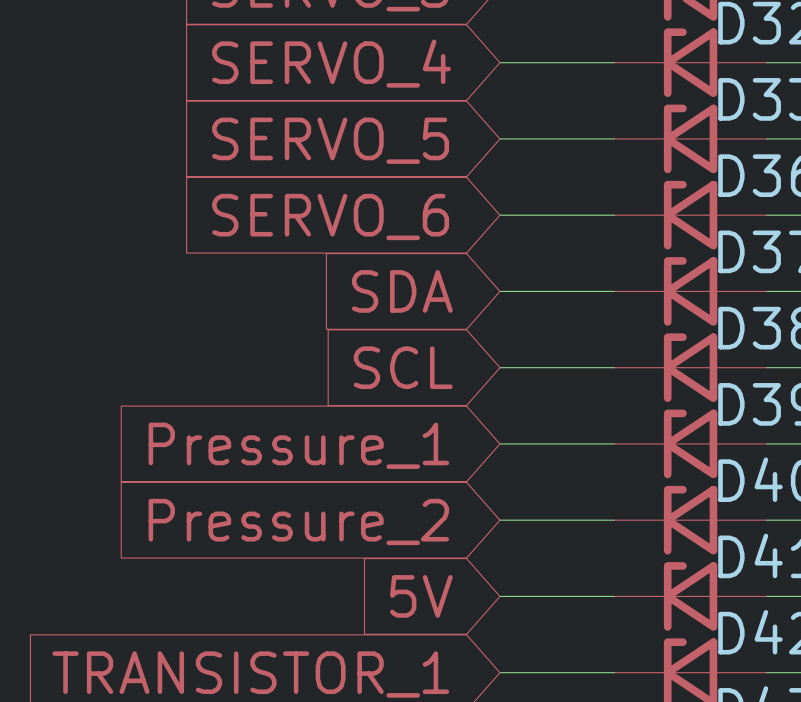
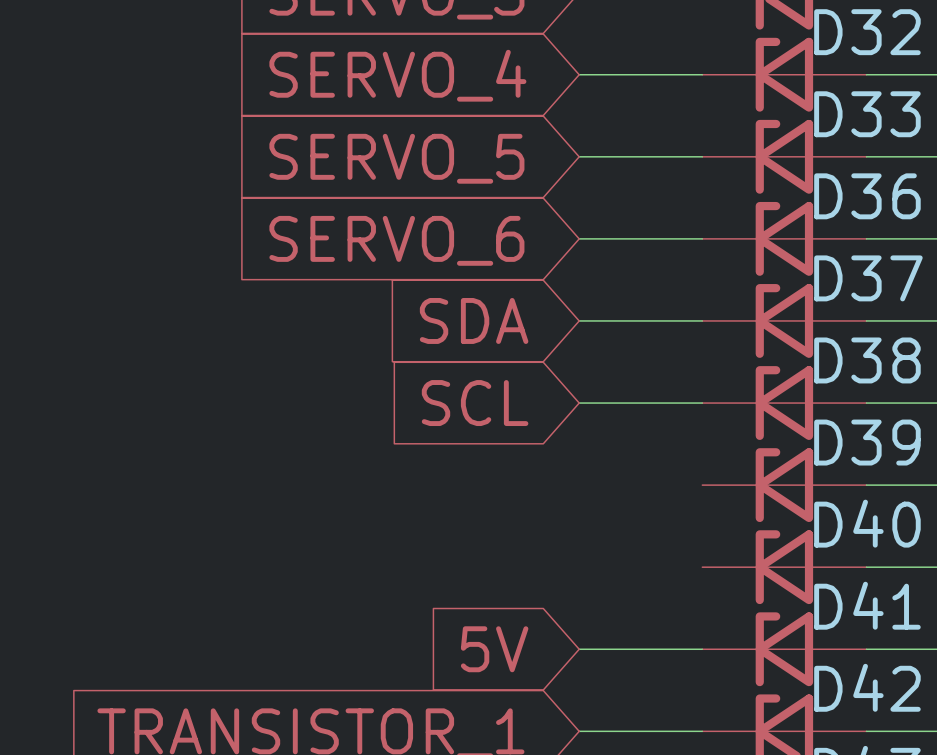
wire: (499, 443) (614, 443) -> none
global label: Pressure_1 (298, 445) -> none
wire: (499, 520) (614, 520) -> none
global label: Pressure_2 (298, 522) -> none

